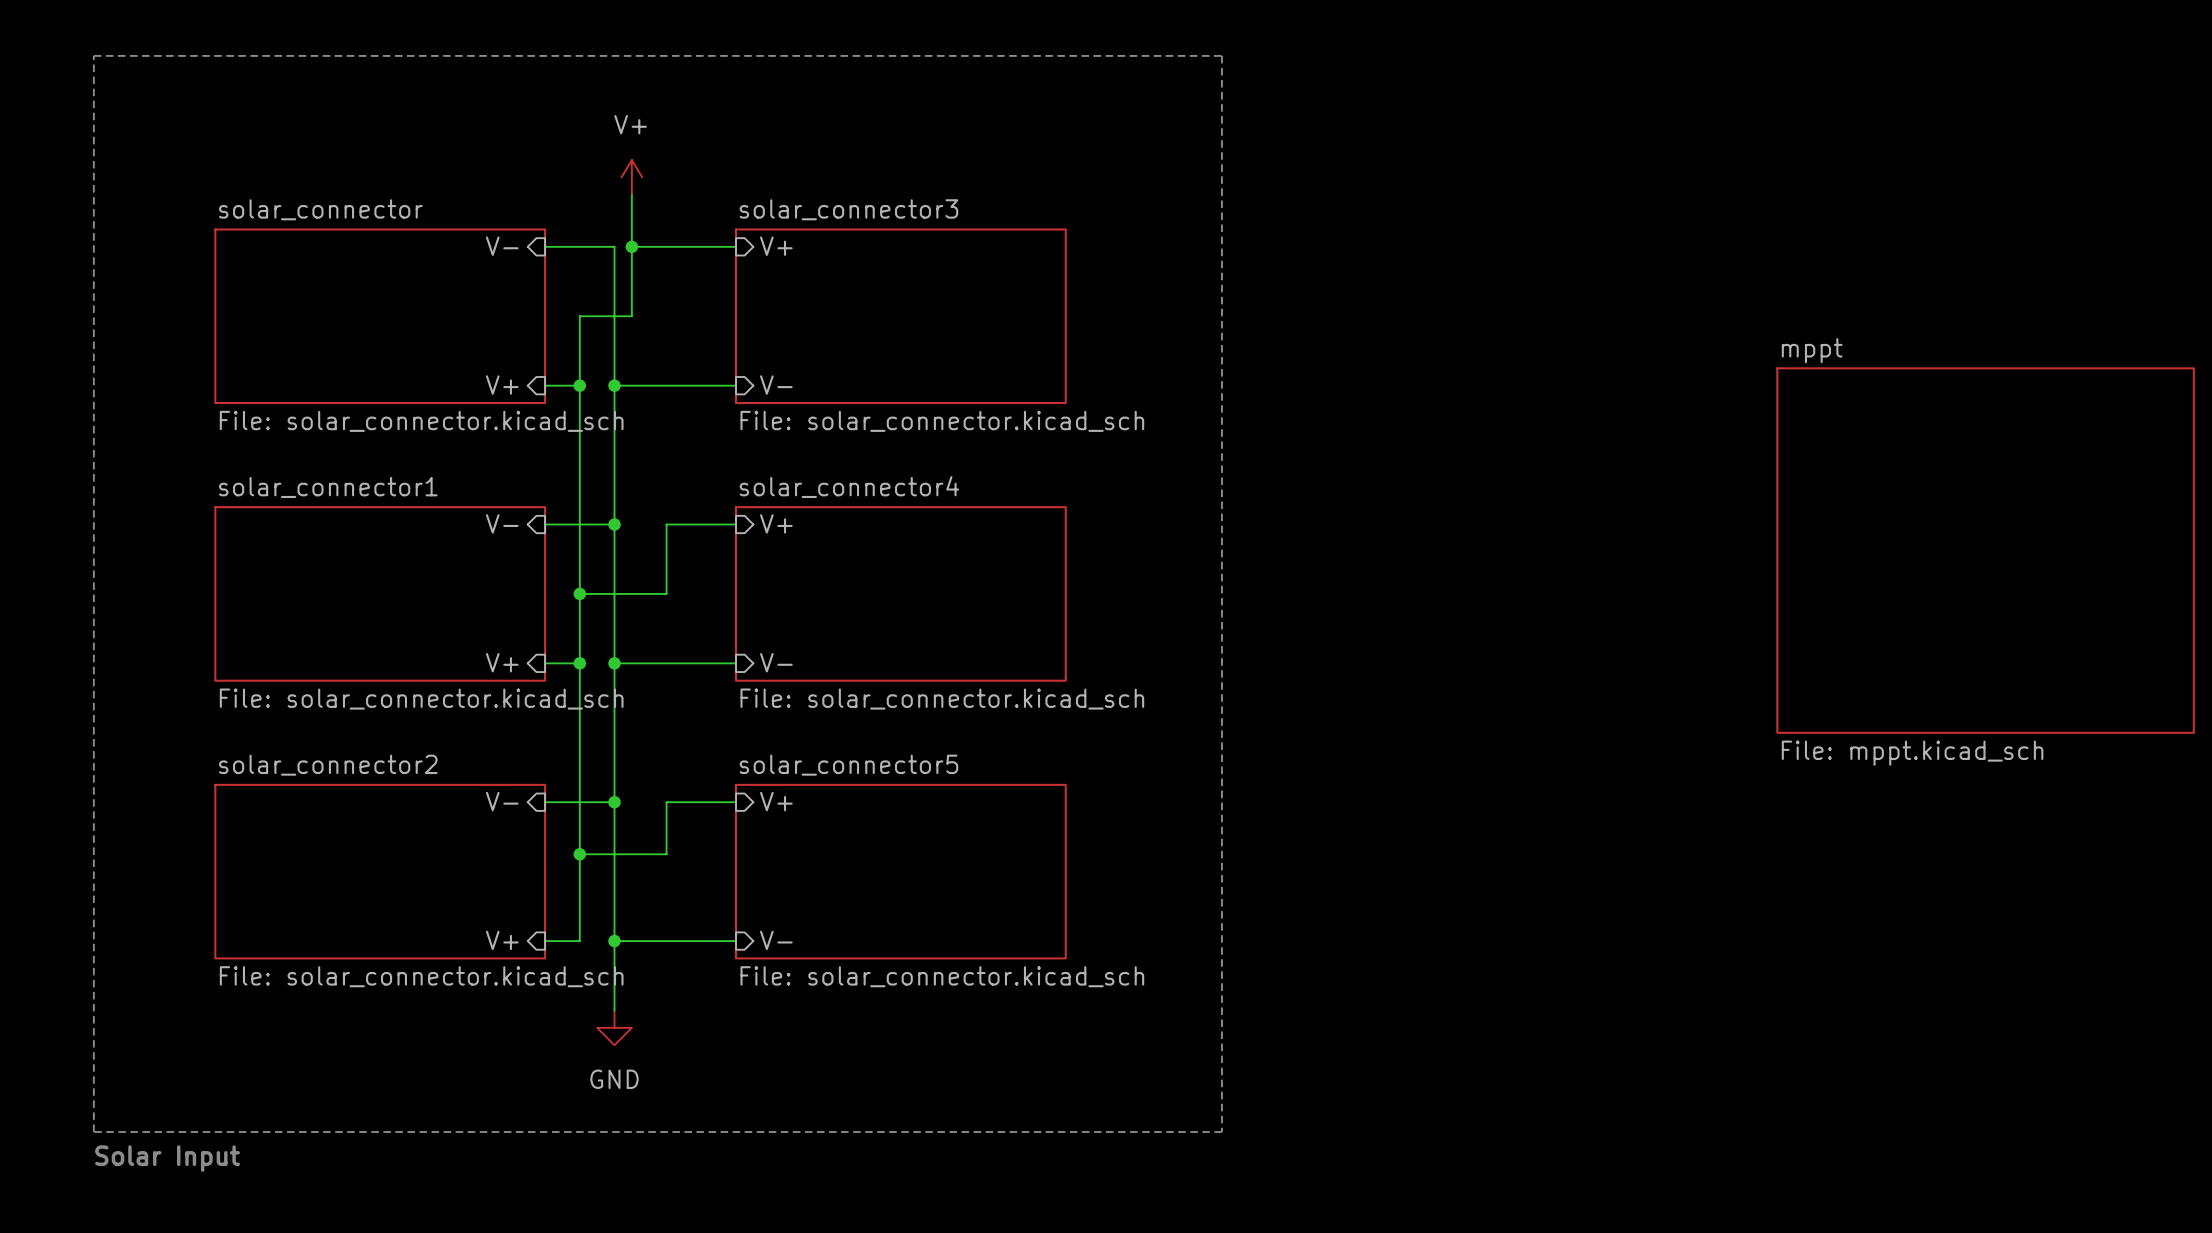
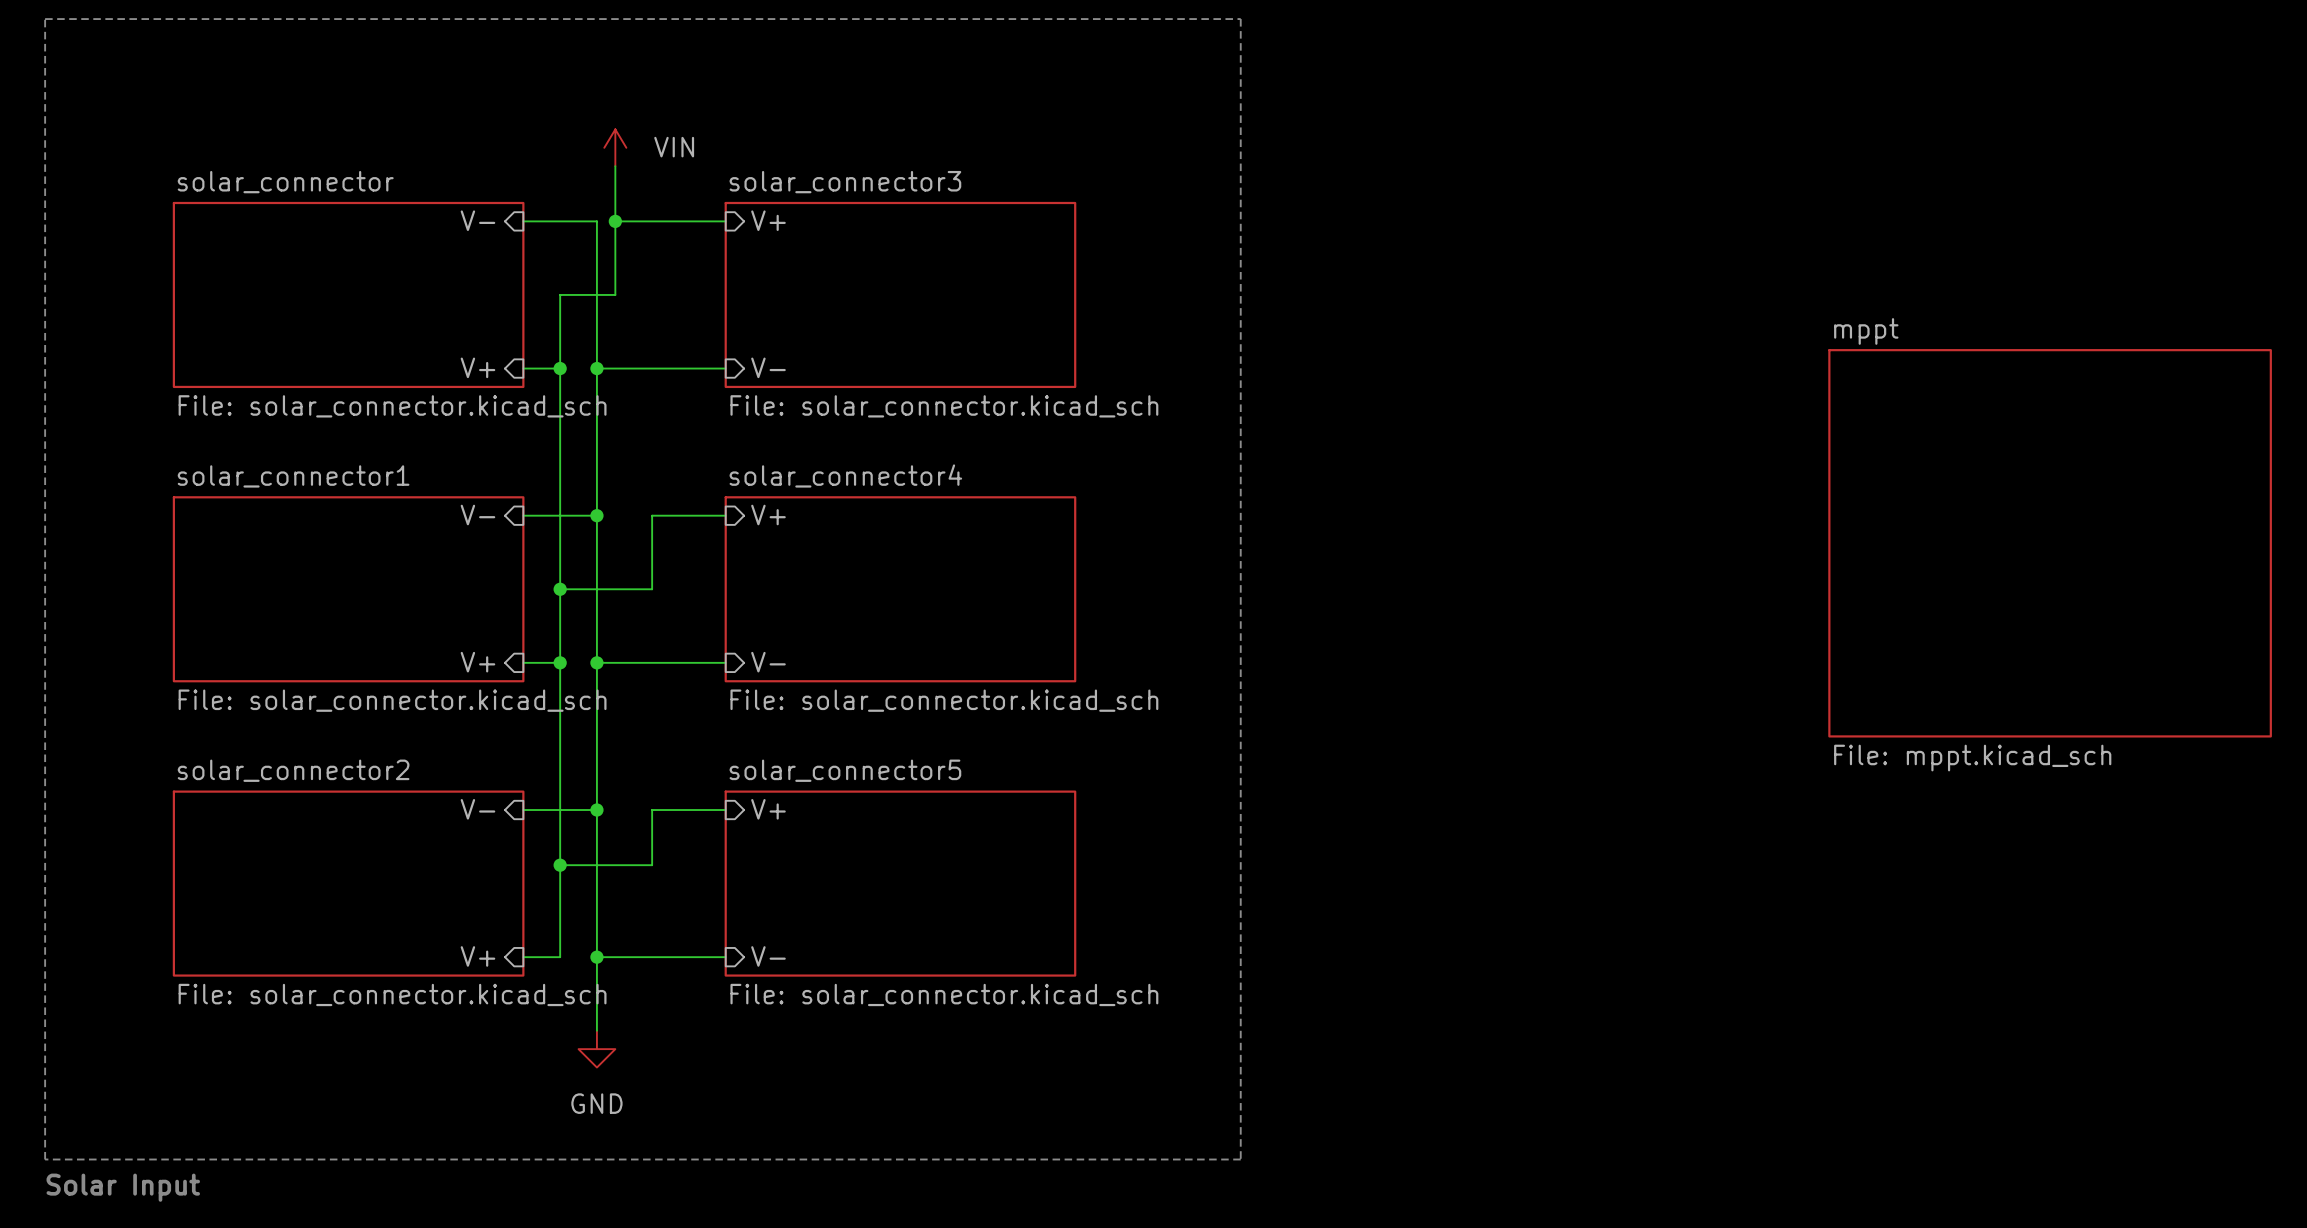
power symbol: V+ (631, 177) -> VIN (615, 147)

